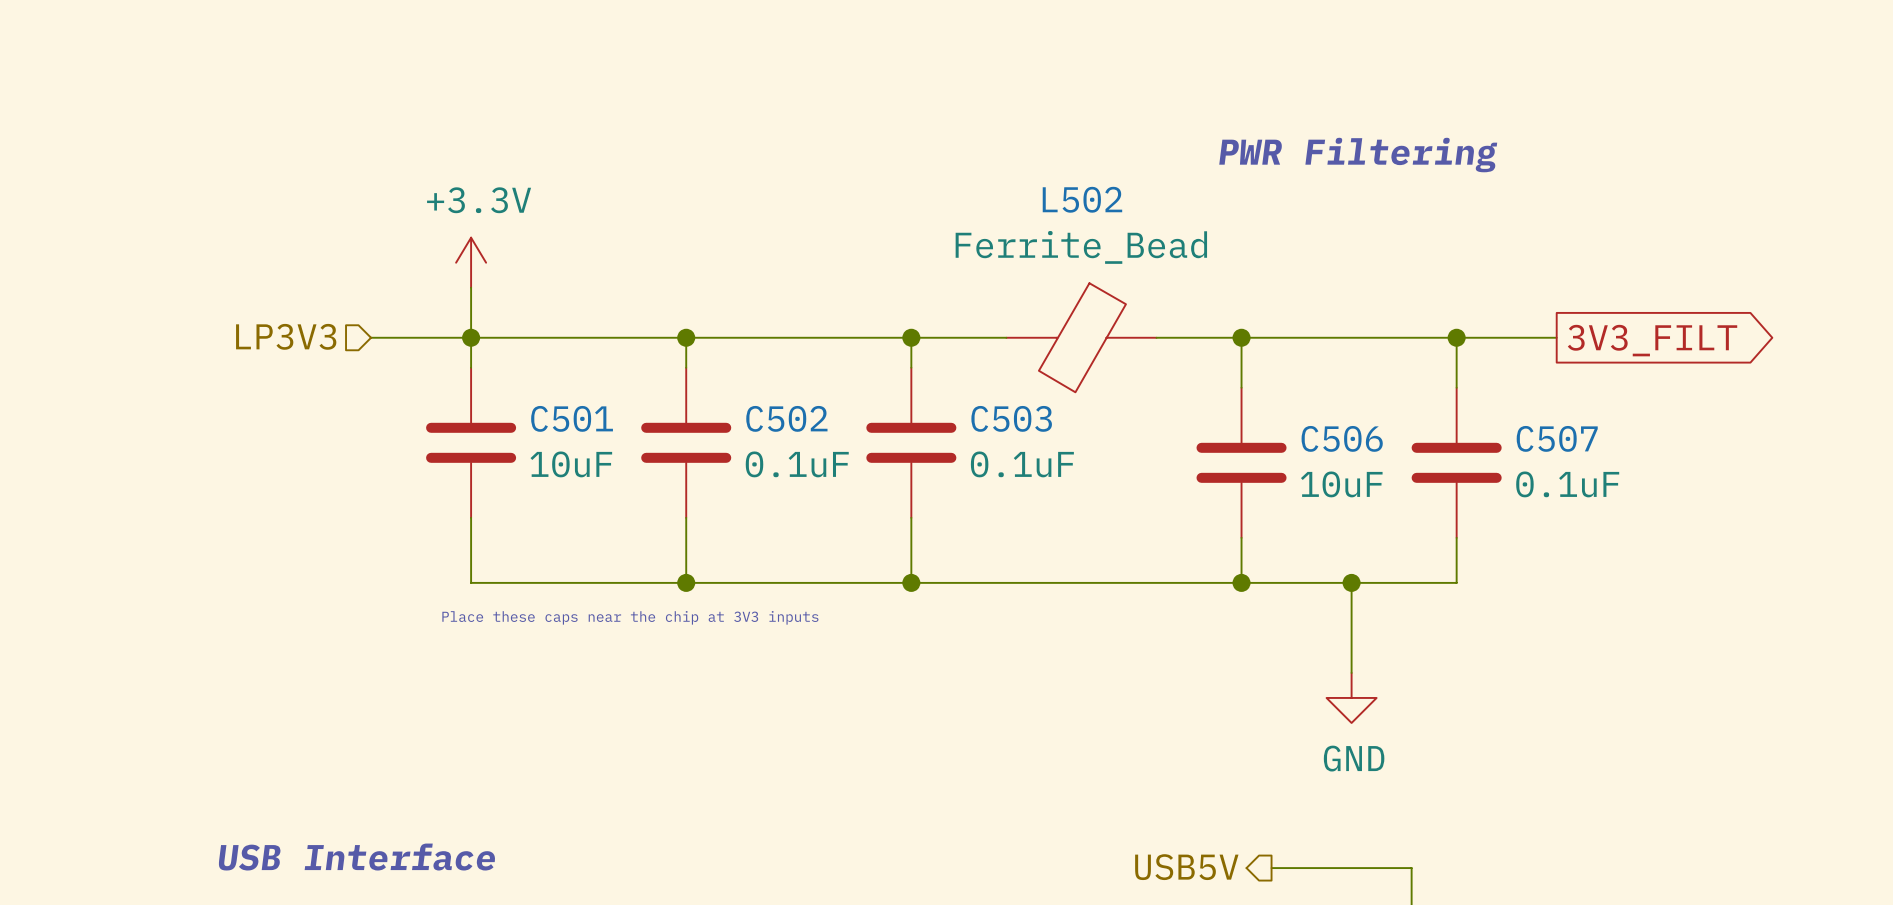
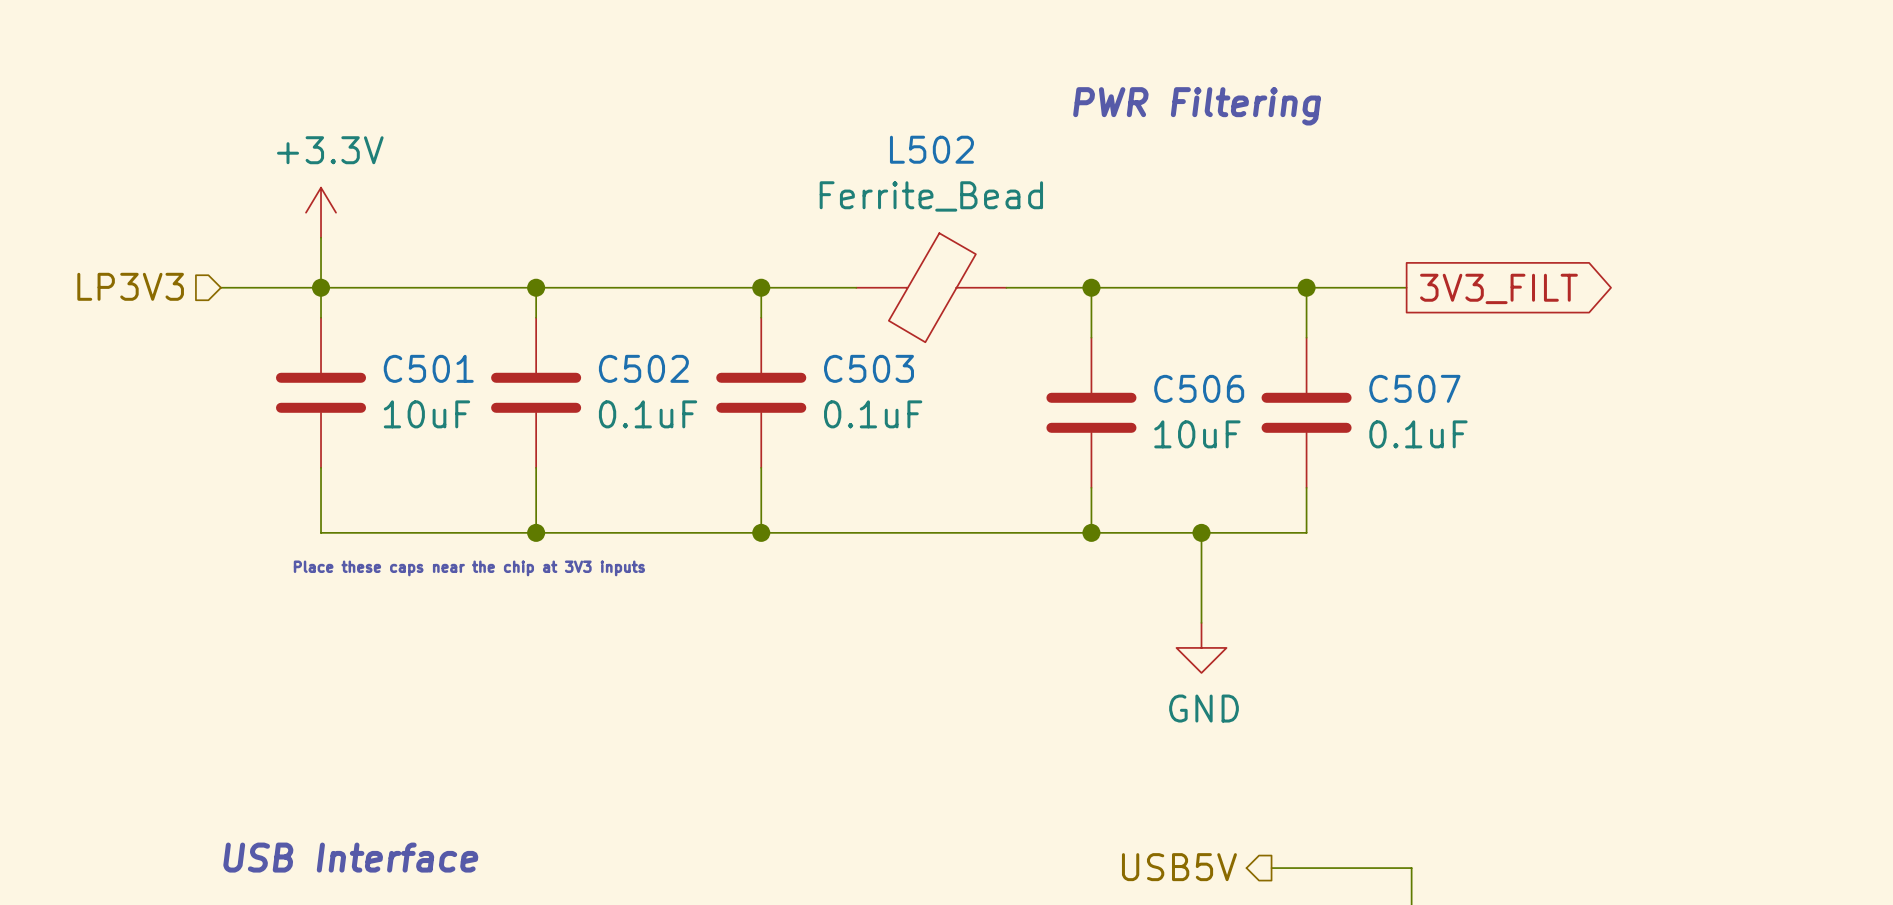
text position: PWR Filtering (1358, 155) -> PWR Filtering (1197, 106)
power symbol position: +3.3V (471, 262) -> +3.3V (321, 212)
junction: none -> (321, 287)
wire: (471, 287) (471, 367) -> (321, 237) (321, 317)
junction: none -> (536, 287)
junction: none -> (761, 287)
junction: none -> (1091, 287)
junction: none -> (1306, 287)
hierarchical label position: LP3V3 (286, 336) -> LP3V3 (130, 286)
wire: (371, 337) (1006, 337) -> (220, 287) (856, 287)
junction: (471, 337) -> none
wire: (686, 337) (686, 367) -> (536, 287) (536, 317)
junction: (686, 337) -> none
wire: (911, 337) (911, 367) -> (761, 287) (761, 317)
junction: (911, 337) -> none
L502 position: (1081, 337) -> (931, 287)
wire: (1156, 337) (1556, 337) -> (1006, 287) (1406, 287)
wire: (1241, 337) (1241, 387) -> (1091, 287) (1091, 337)
junction: (1241, 337) -> none
wire: (1456, 337) (1456, 387) -> (1306, 287) (1306, 337)
junction: (1456, 337) -> none
global label position: 3V3_FILT (1652, 340) -> 3V3_FILT (1498, 288)
C501 position: (471, 442) -> (321, 392)
C502 position: (686, 442) -> (536, 392)
C503 position: (911, 442) -> (761, 392)
C506 position: (1241, 462) -> (1091, 412)
C507 position: (1456, 462) -> (1306, 412)
wire: (471, 517) (471, 582) (1456, 582) (1456, 537) -> (321, 467) (321, 532) (1306, 532) (1306, 487)
wire: (686, 517) (686, 582) -> (536, 467) (536, 532)
wire: (911, 517) (911, 582) -> (761, 467) (761, 532)
junction: none -> (536, 532)
junction: none -> (761, 532)
junction: none -> (1091, 532)
wire: (1241, 537) (1241, 582) -> (1091, 487) (1091, 532)
junction: (686, 582) -> none
junction: (911, 582) -> none
junction position: (1241, 582) -> (1201, 532)
wire: (1351, 582) (1351, 672) -> (1201, 532) (1201, 622)
junction: (1351, 582) -> none
text position: Place these caps near the chip at 3V3 inputs (630, 617) -> Place these caps near the chip at 3V3 inputs (469, 568)
power symbol position: GND (1351, 697) -> GND (1201, 647)

